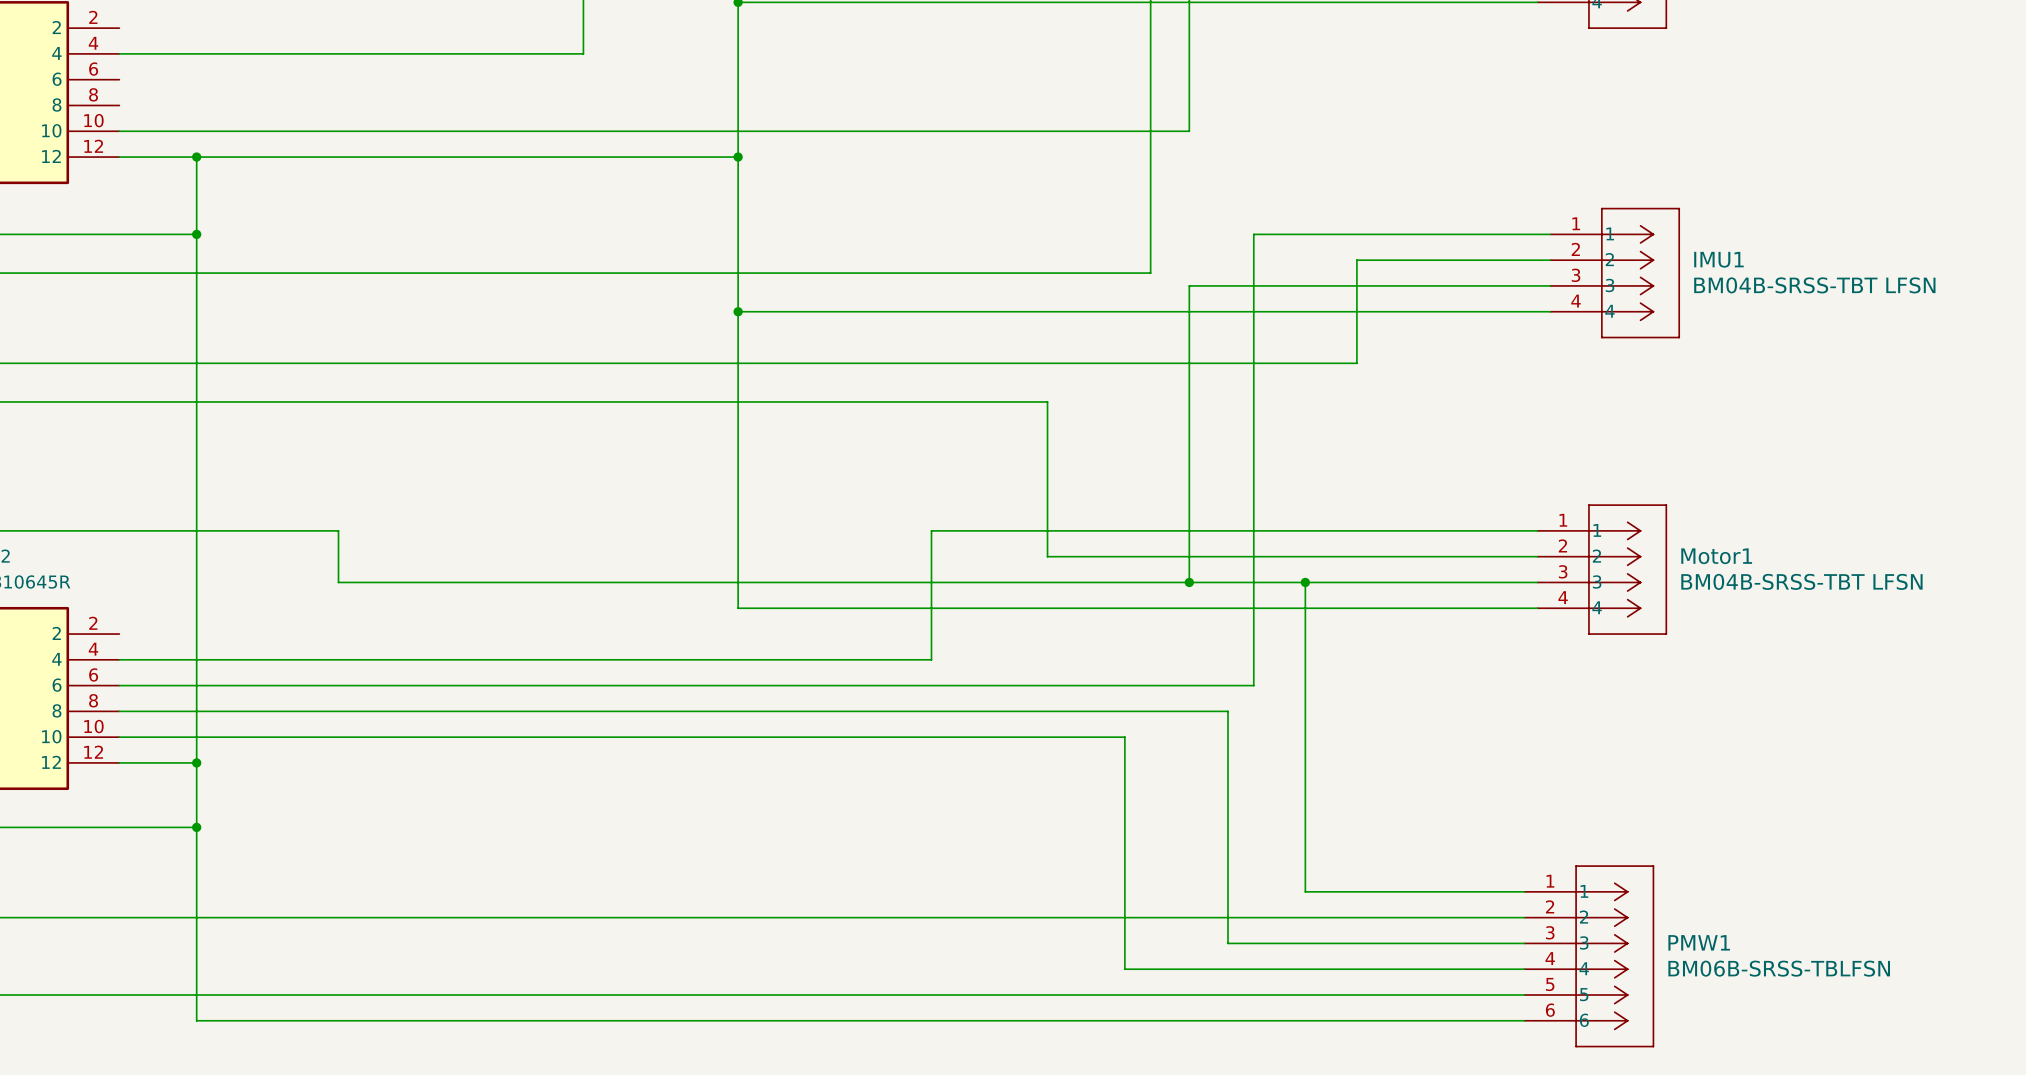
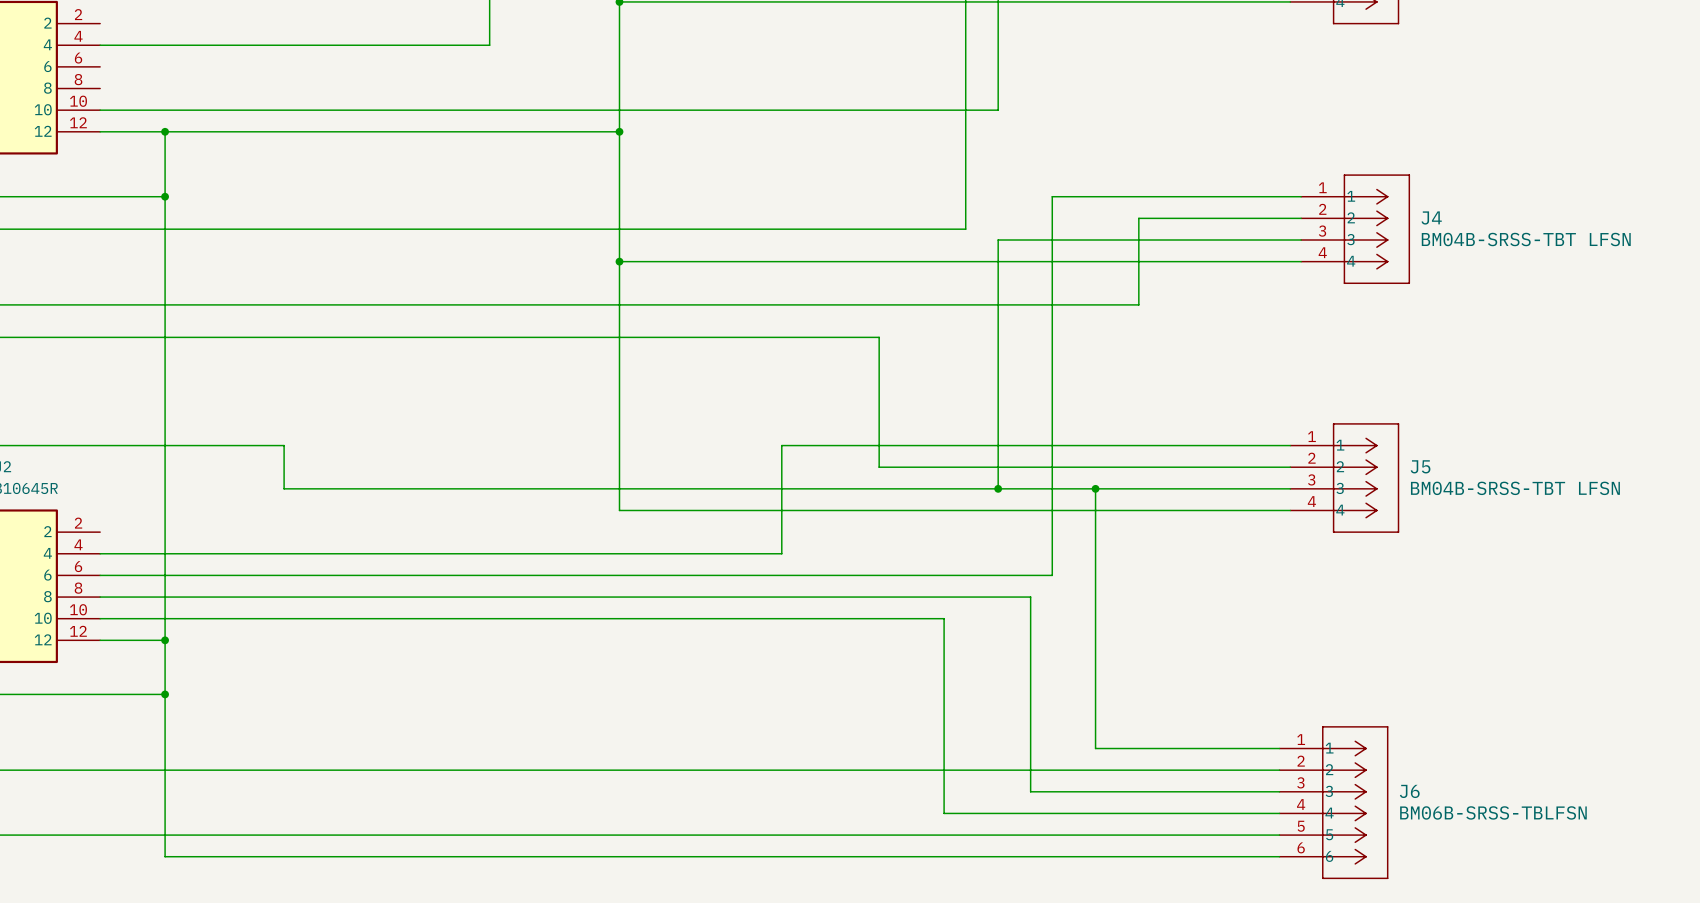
IMU1 name: IMU1 (1718, 259) -> J4 (1431, 217)
Motor1 name: Motor1 (1716, 556) -> J5 (1420, 466)
PMW1 name: PMW1 (1699, 942) -> J6 (1409, 791)

